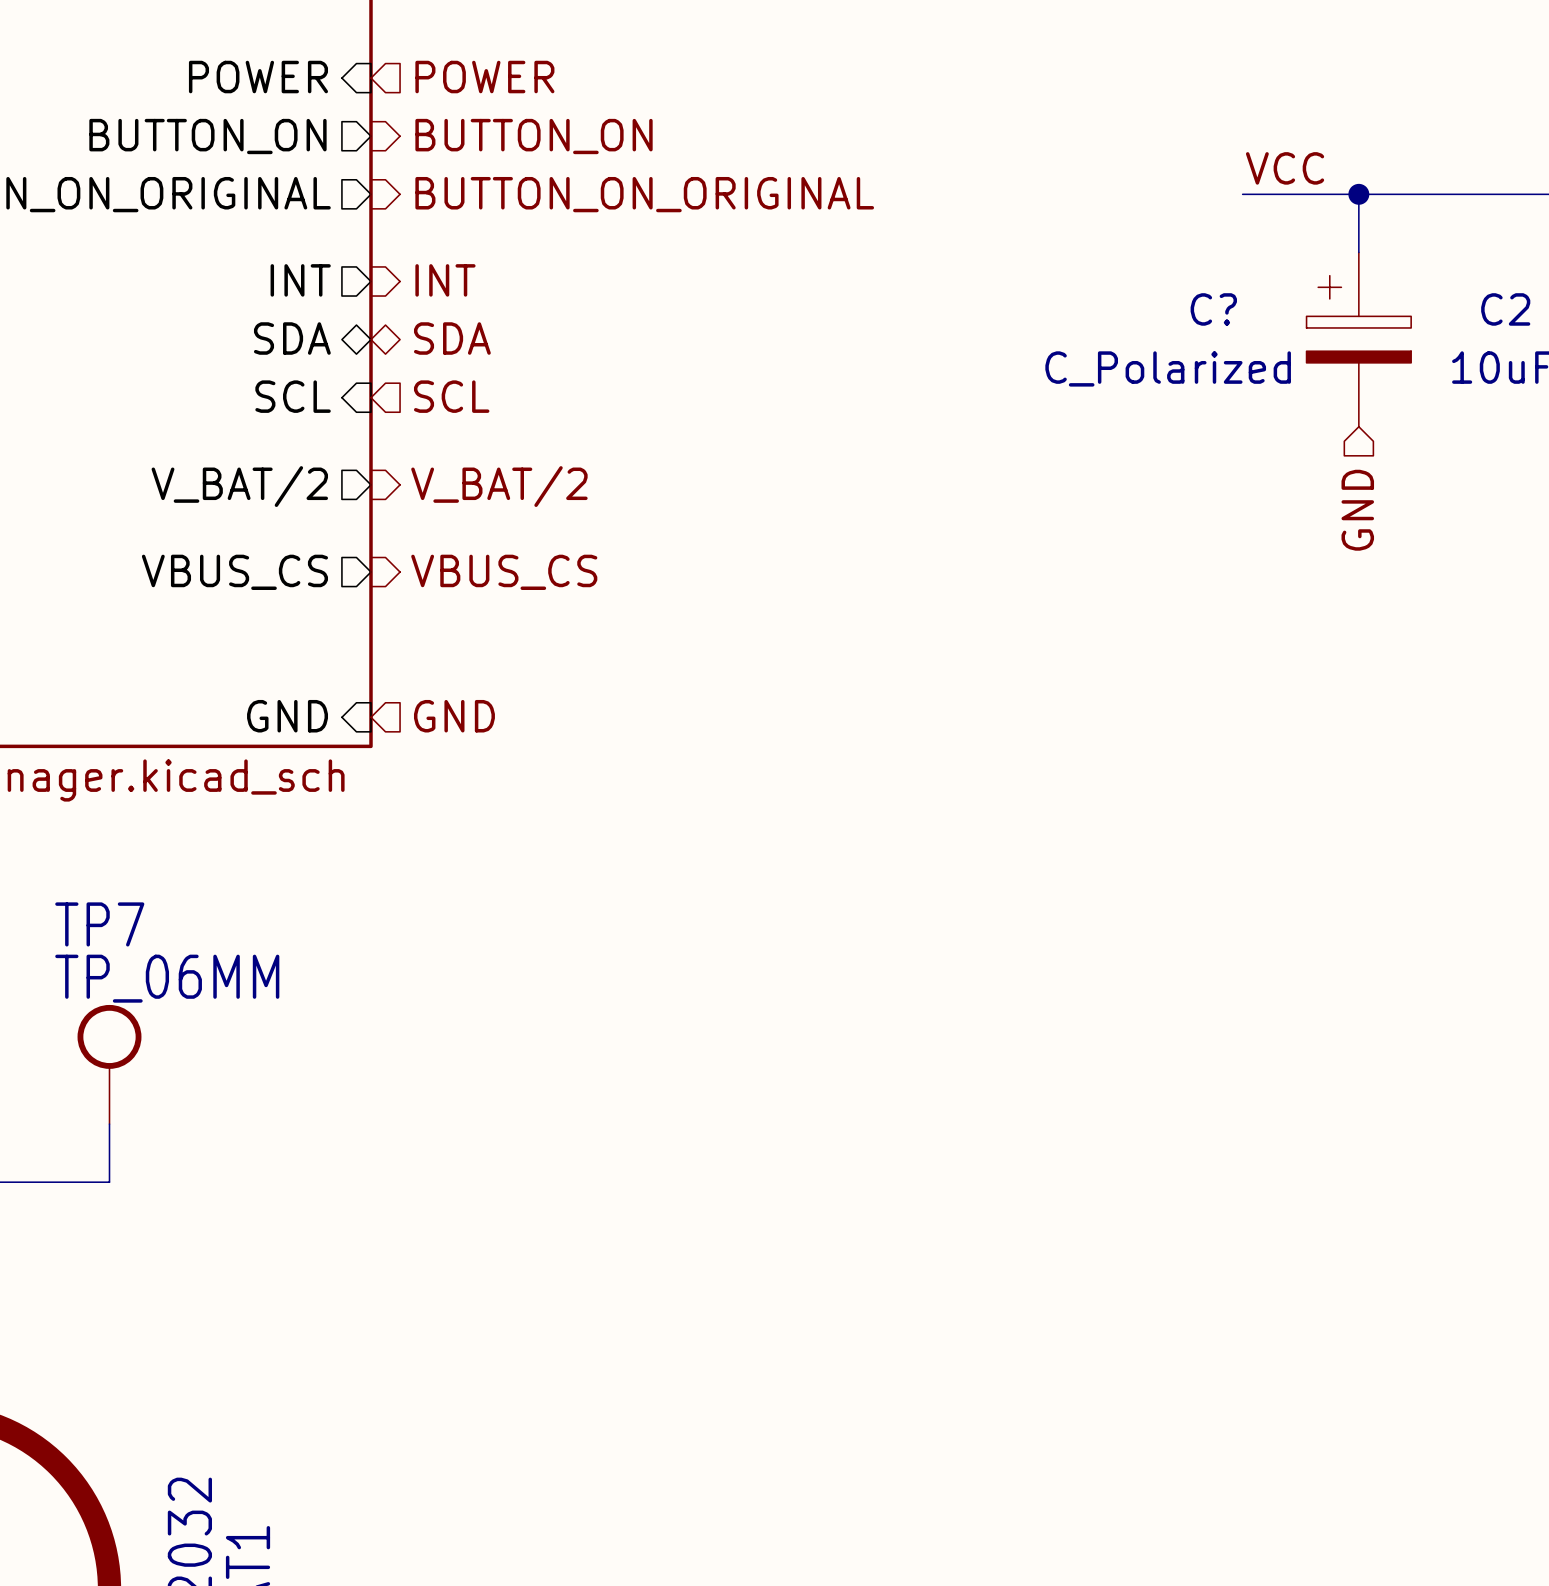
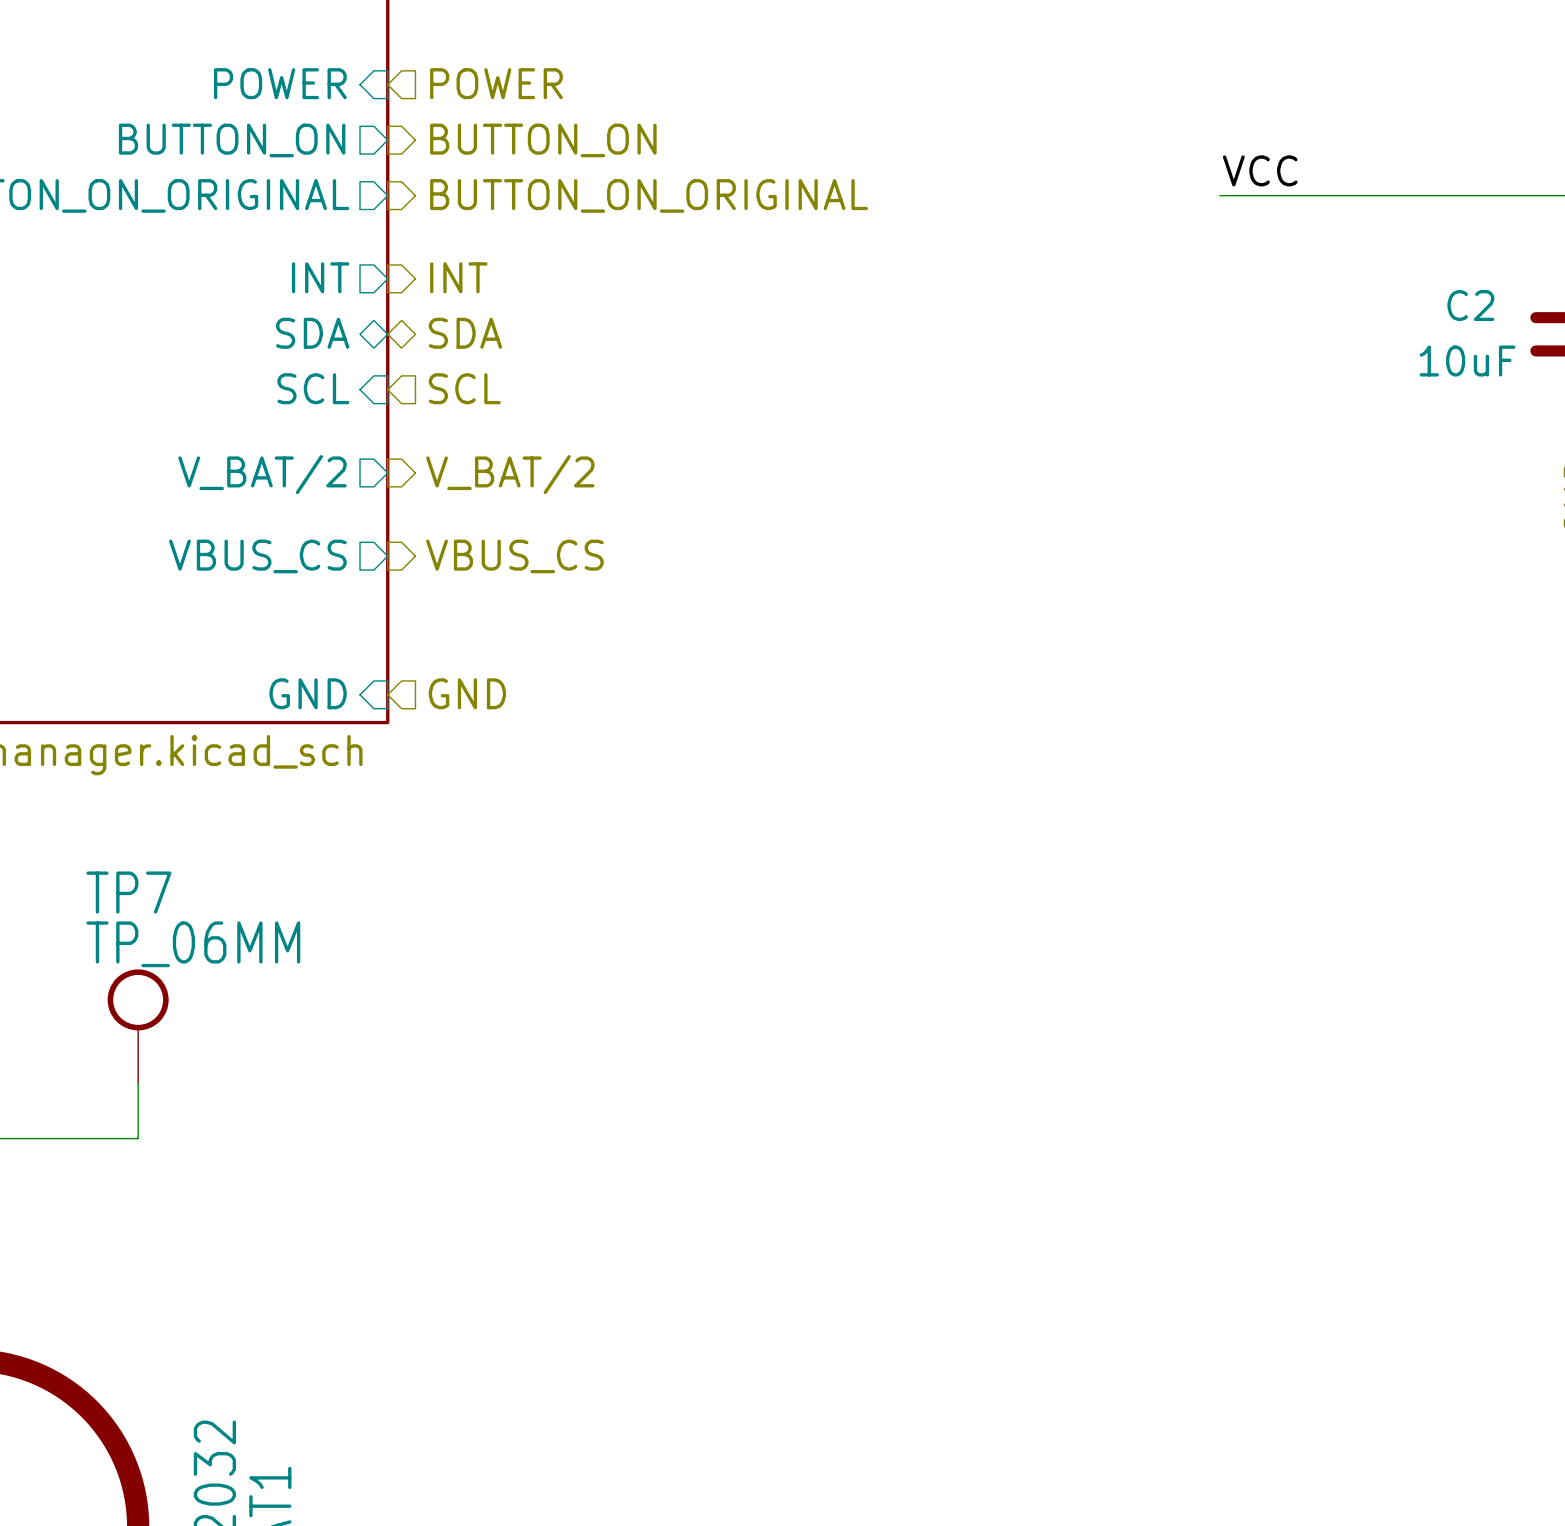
wire: (1358, 194) (1358, 252) -> none
junction: (1358, 194) -> none
C?: C_Polarized (1358, 339) -> none
hierarchical label: GND (1357, 510) -> none

